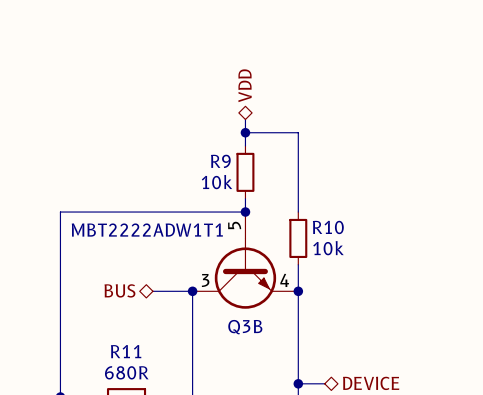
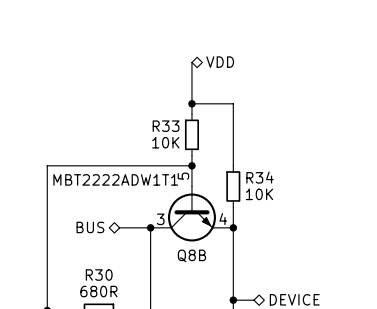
wire: none -> (191, 62) (191, 93)
hierarchical label rotation: 0° (245, 85) -> 90° clockwise (220, 62)
R9 name: R9 (220, 161) -> R33 (166, 126)
R9 value: 10k (217, 182) -> 10K (165, 142)
R10 name: R10 (328, 227) -> R34 (259, 177)
R10 value: 10k (328, 248) -> 10K (259, 194)
Q3B name: Q3B (245, 327) -> Q8B (191, 255)
R11 name: R11 (126, 351) -> R30 (99, 275)

